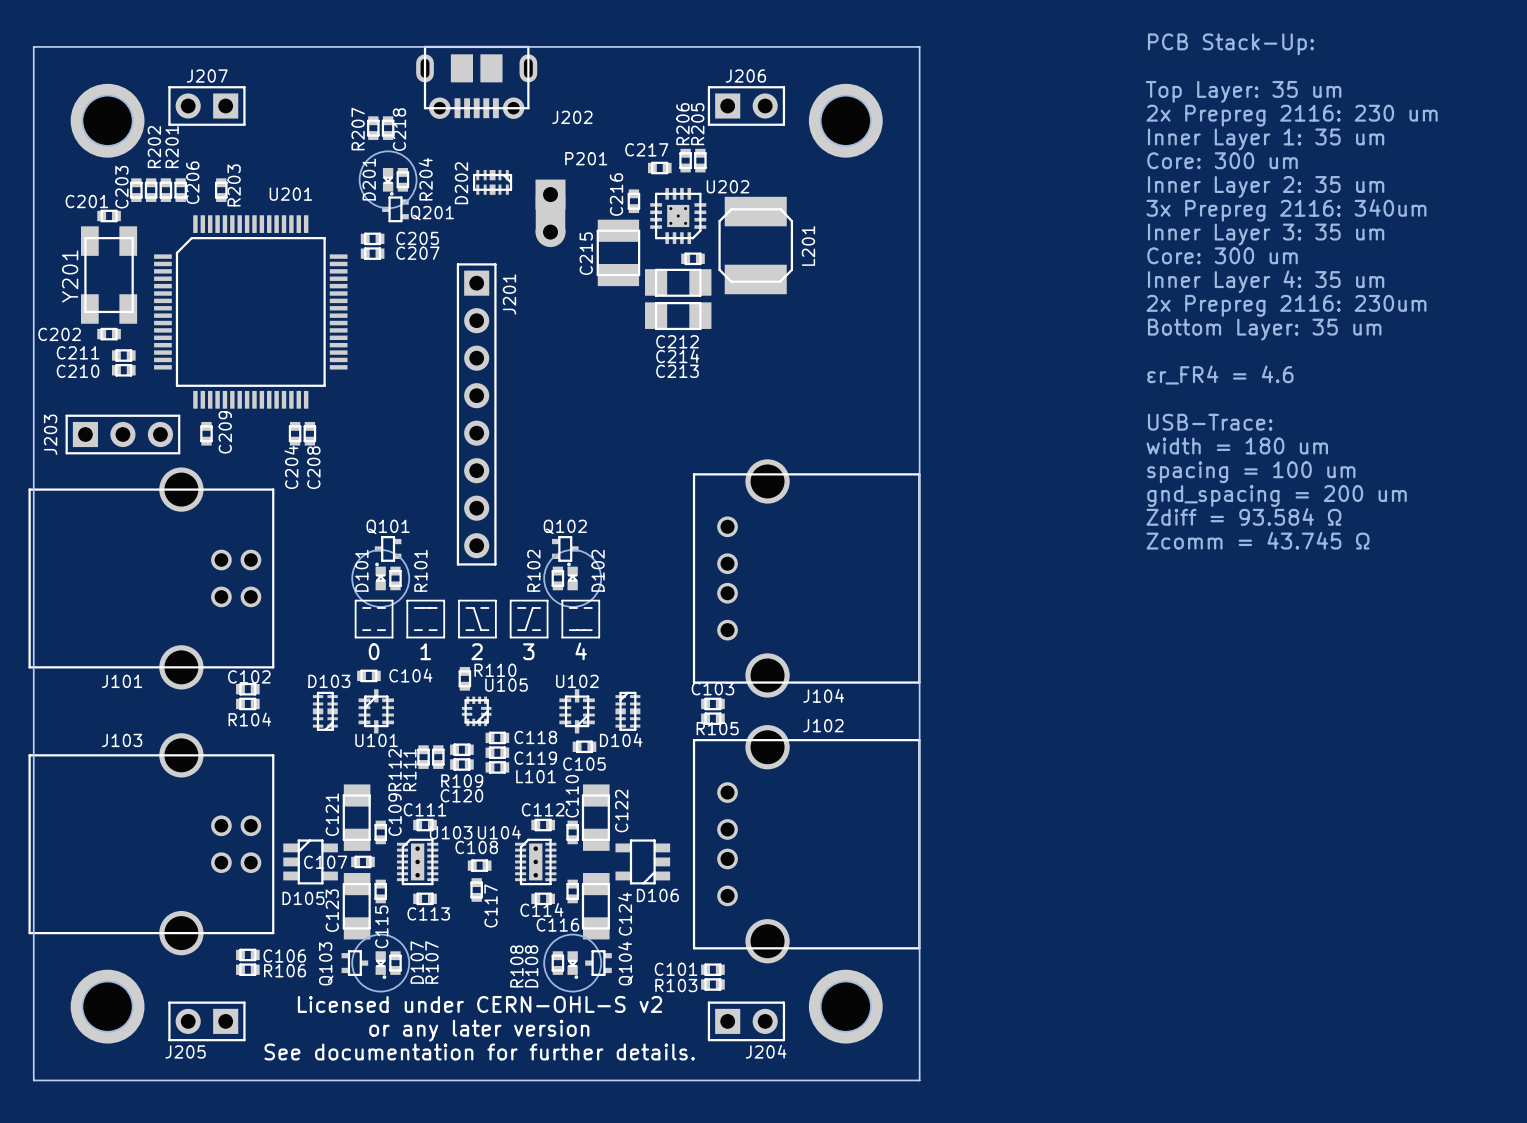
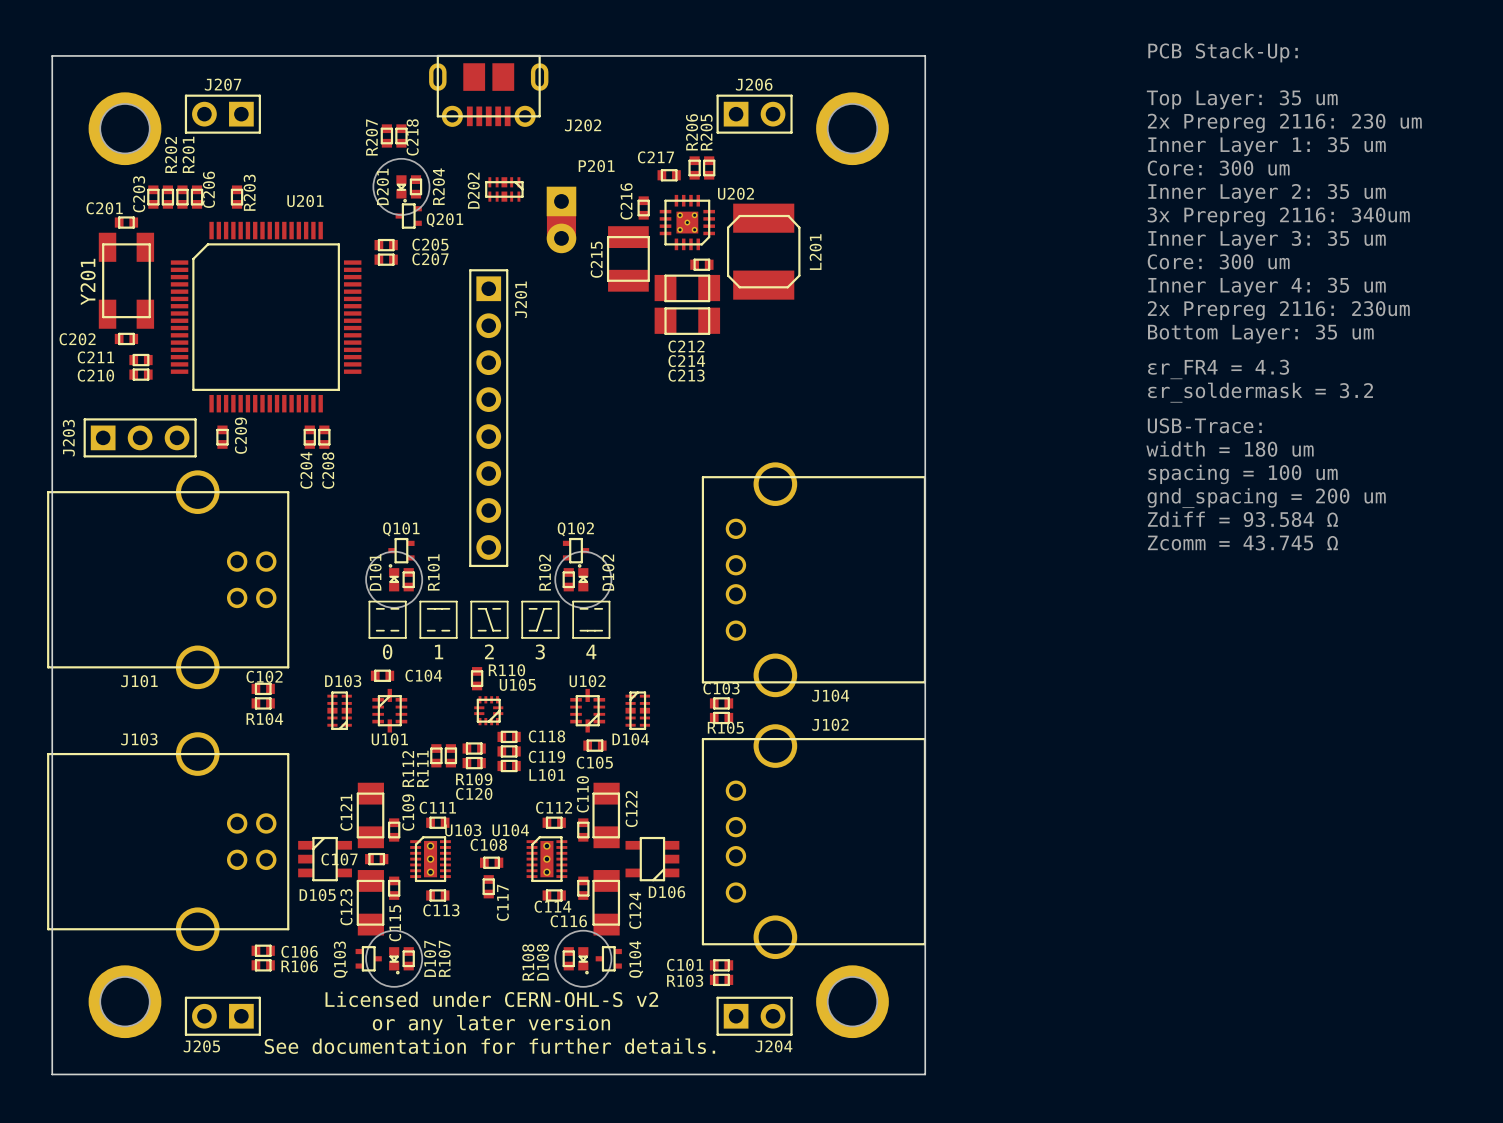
text: εr_FR4 = 4.6 (1220, 375) -> εr_FR4 = 4.3 (1218, 369)
text: none -> εr_soldermask = 3.2 (1260, 392)

